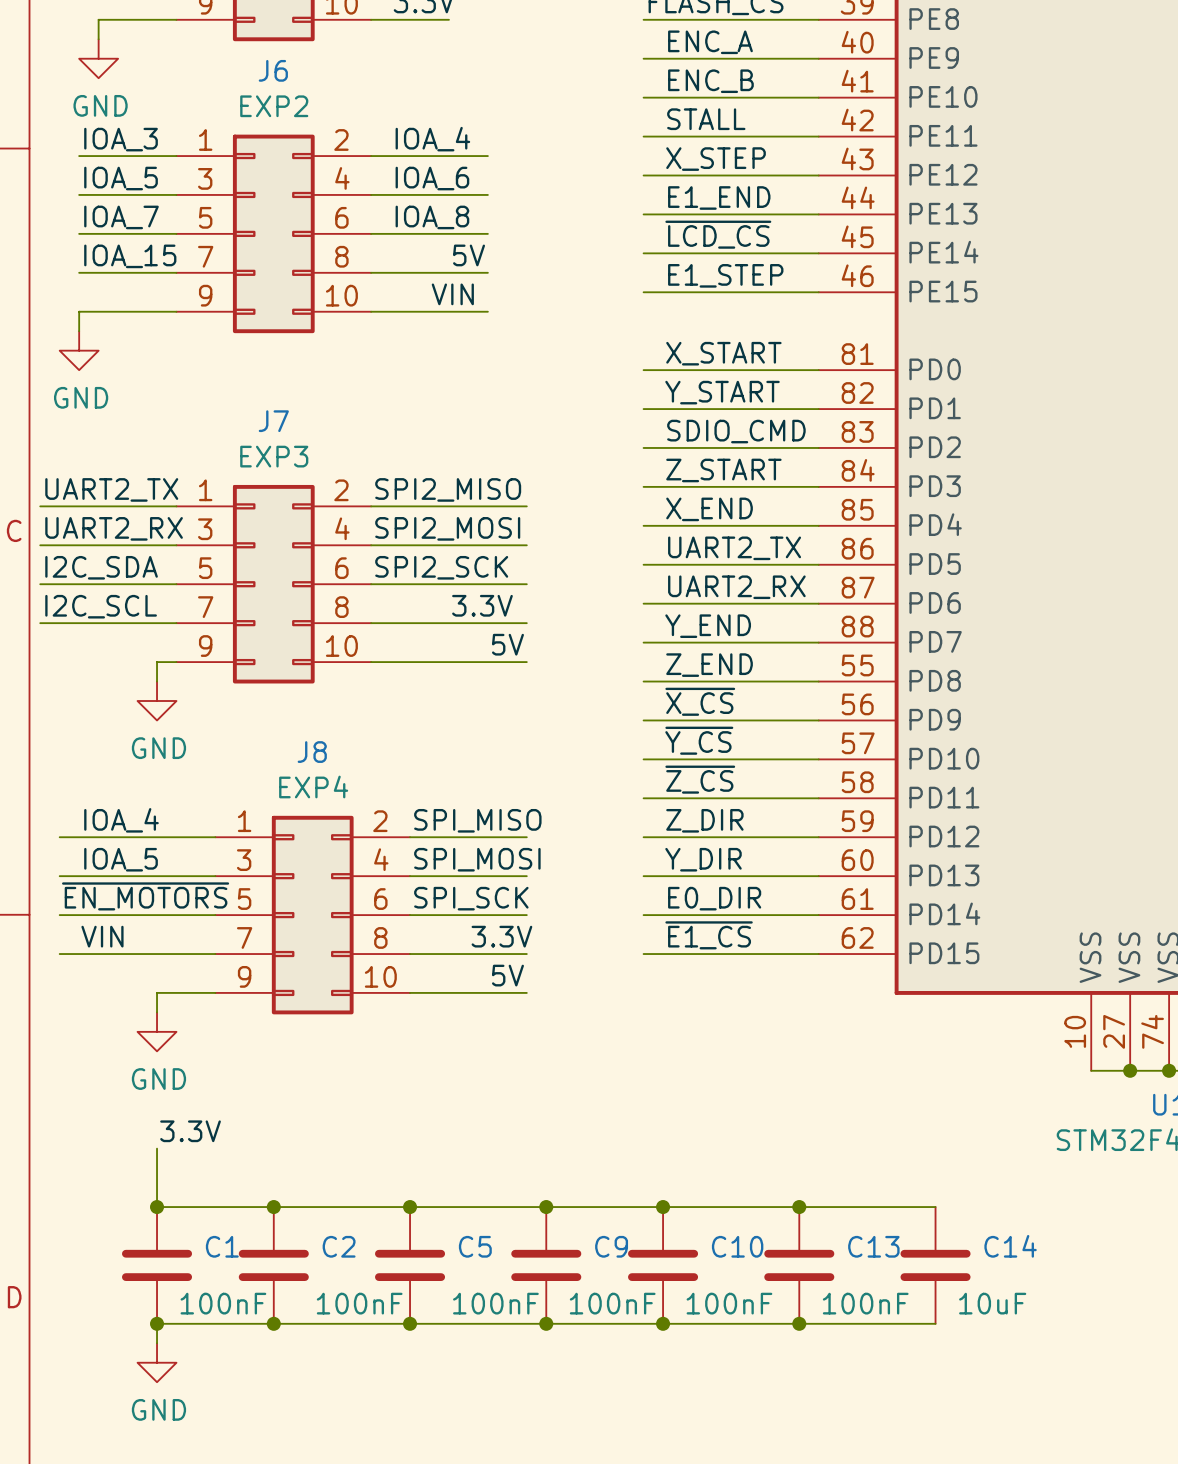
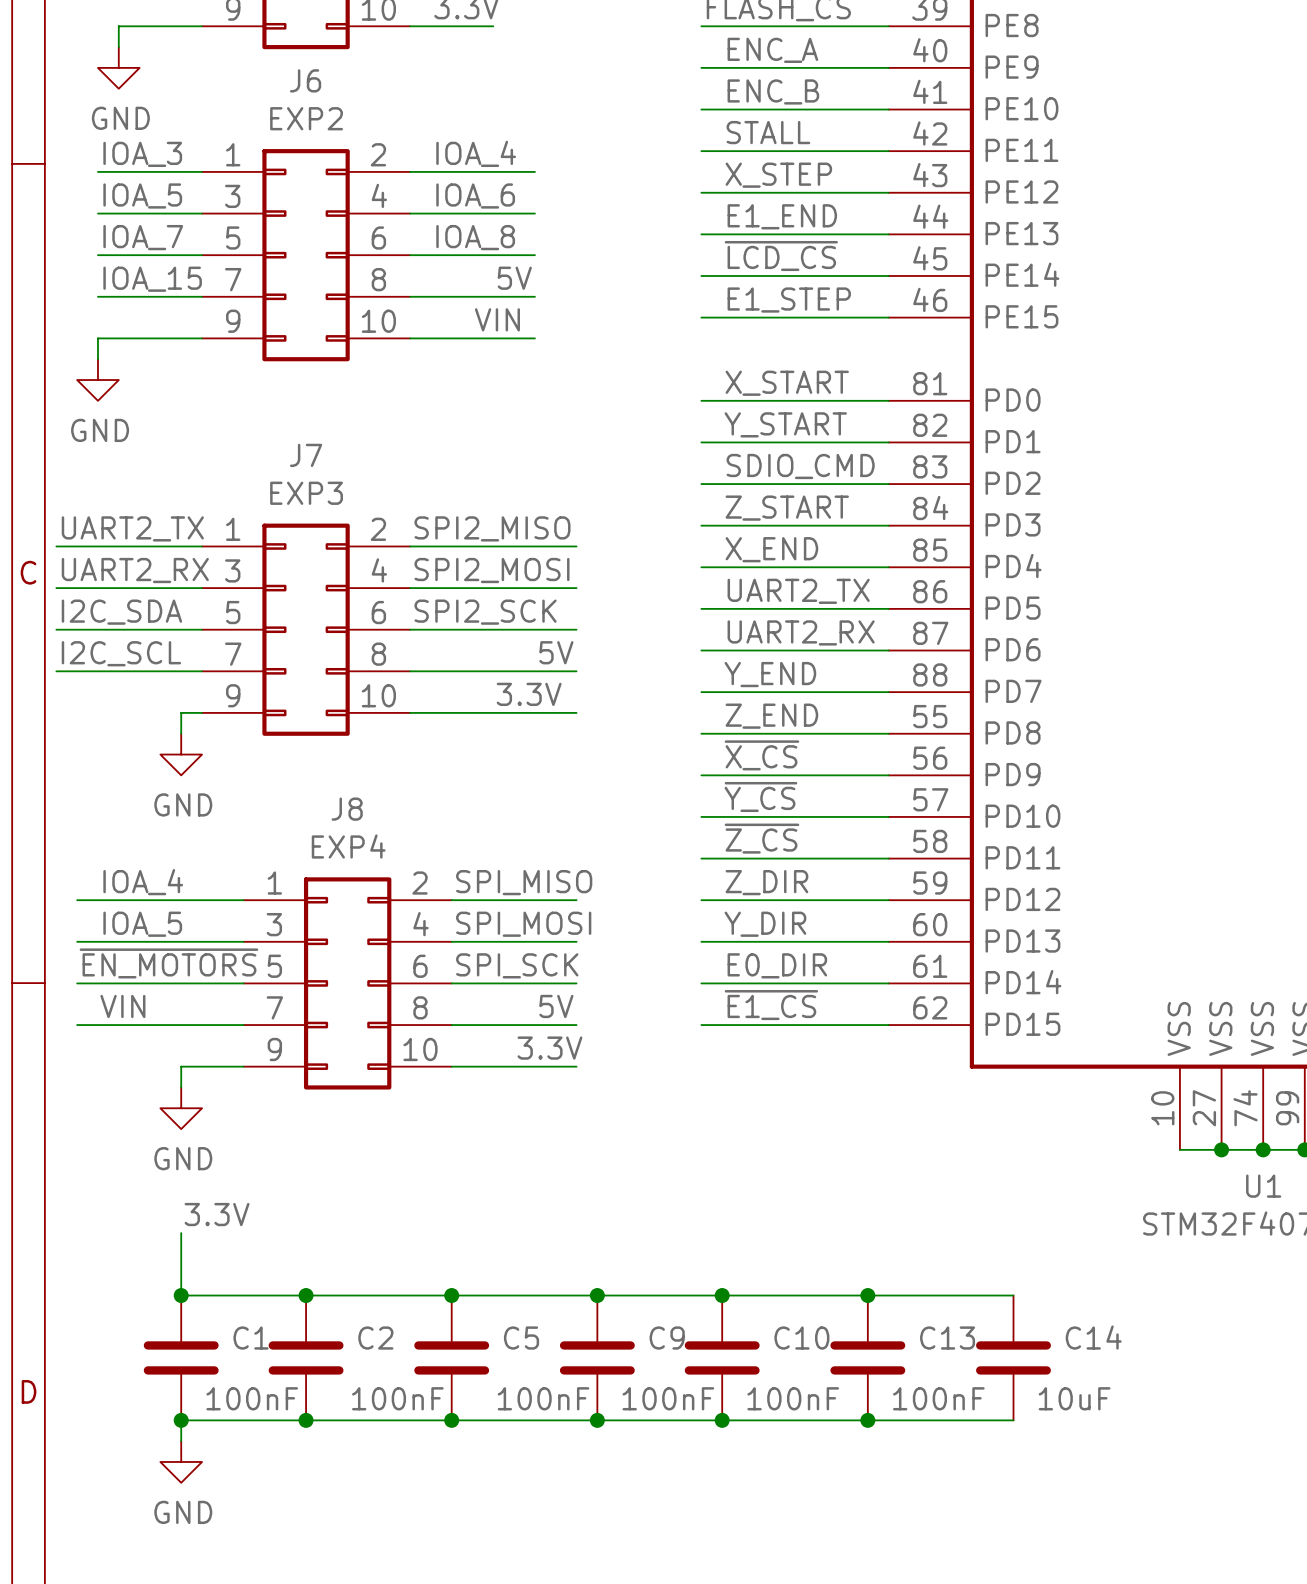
label position: 3.3V (482, 605) -> 3.3V (529, 694)
label position: 5V (507, 644) -> 5V (556, 652)
label position: 3.3V (501, 936) -> 3.3V (549, 1048)
label position: 5V (507, 975) -> 5V (556, 1006)

